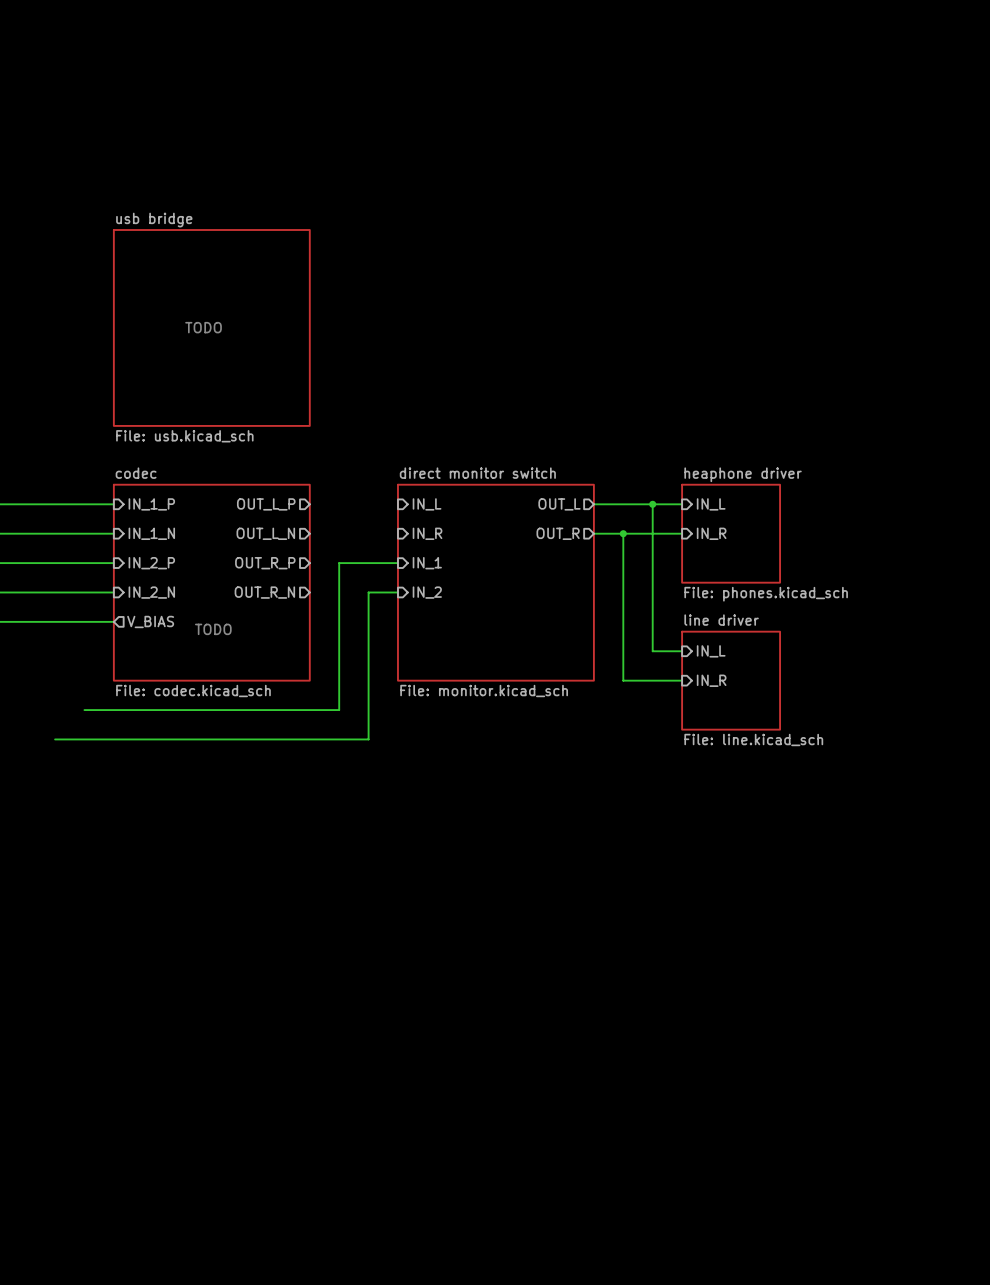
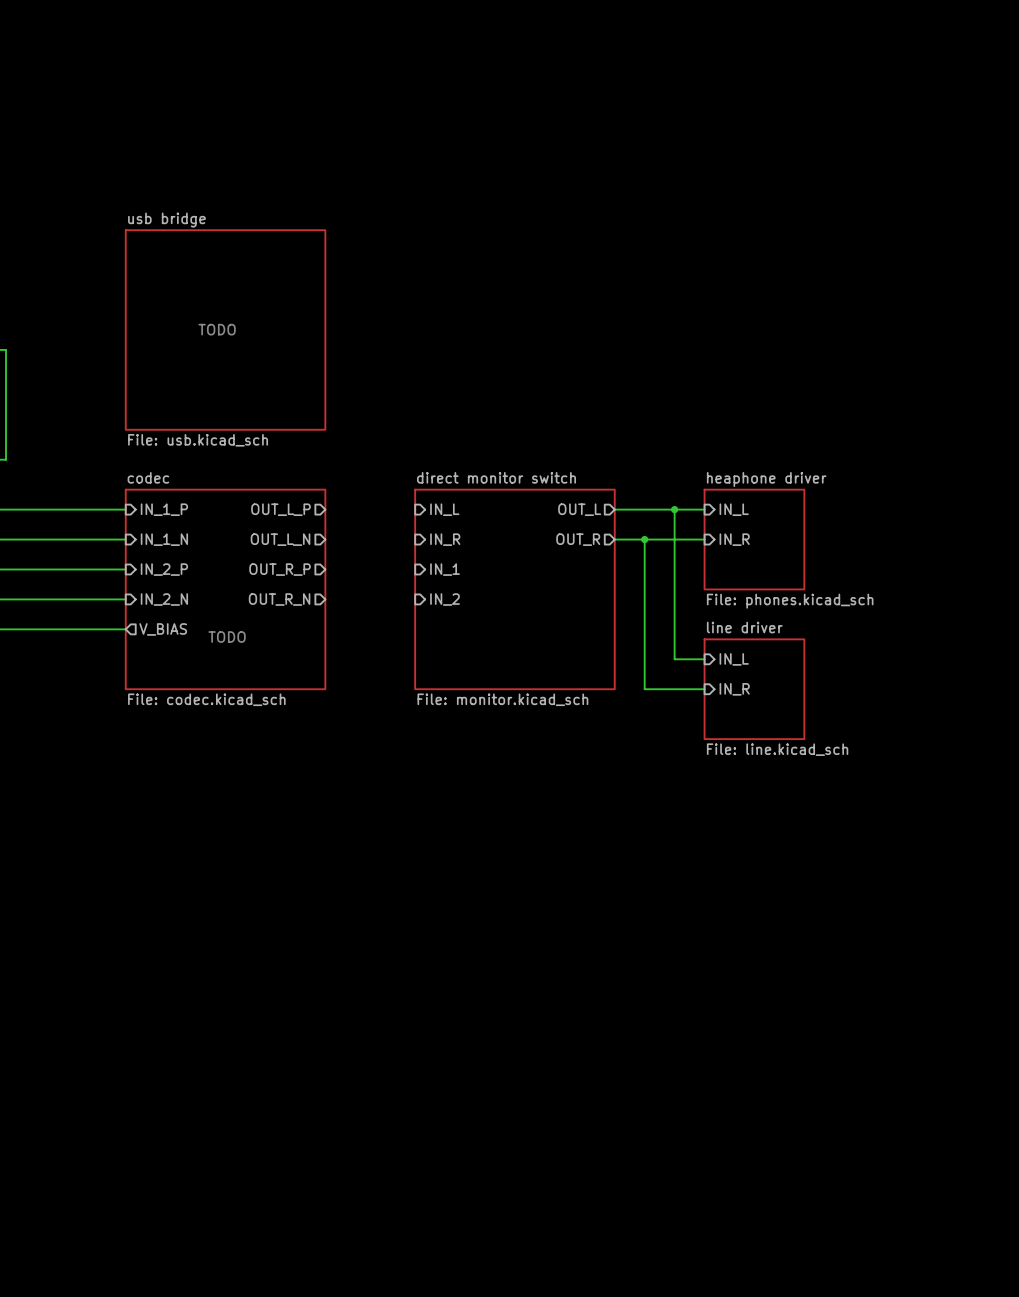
wire: (397, 563) (339, 563) (339, 710) (84, 710) -> none
wire: (397, 592) (368, 592) (368, 739) (55, 739) -> none

